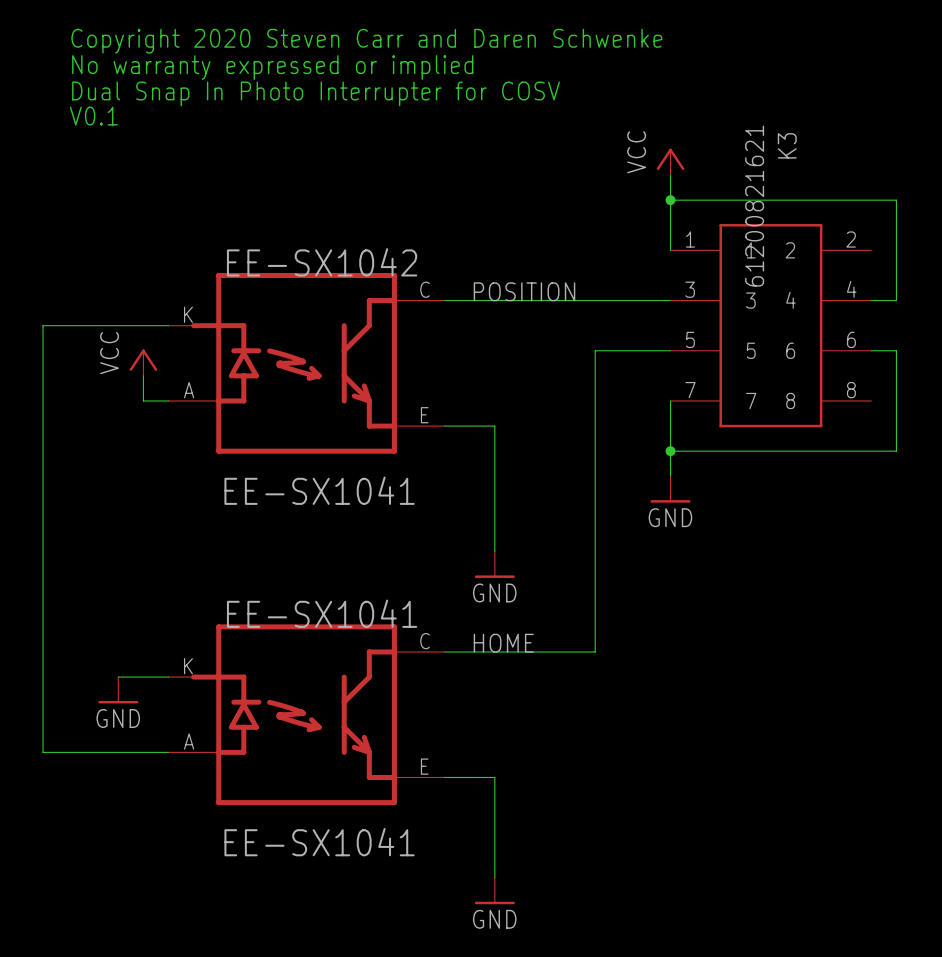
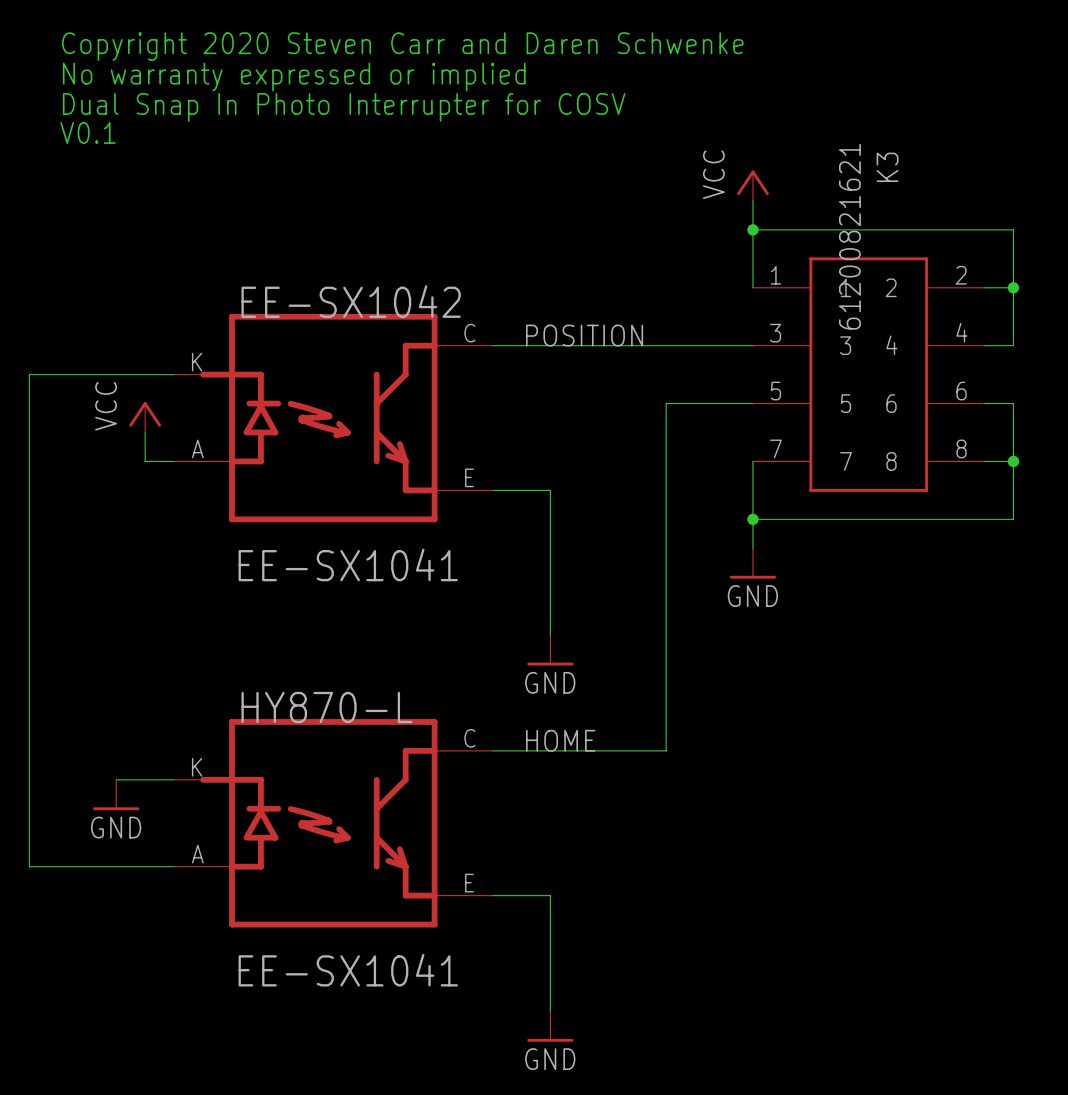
wire: none -> (984, 287) (1013, 287)
junction: none -> (1013, 287)
wire: none -> (984, 461) (1013, 461)
junction: none -> (1013, 461)
EE-SX1041 name: EE-SX1041 (322, 613) -> HY870-L (326, 707)

